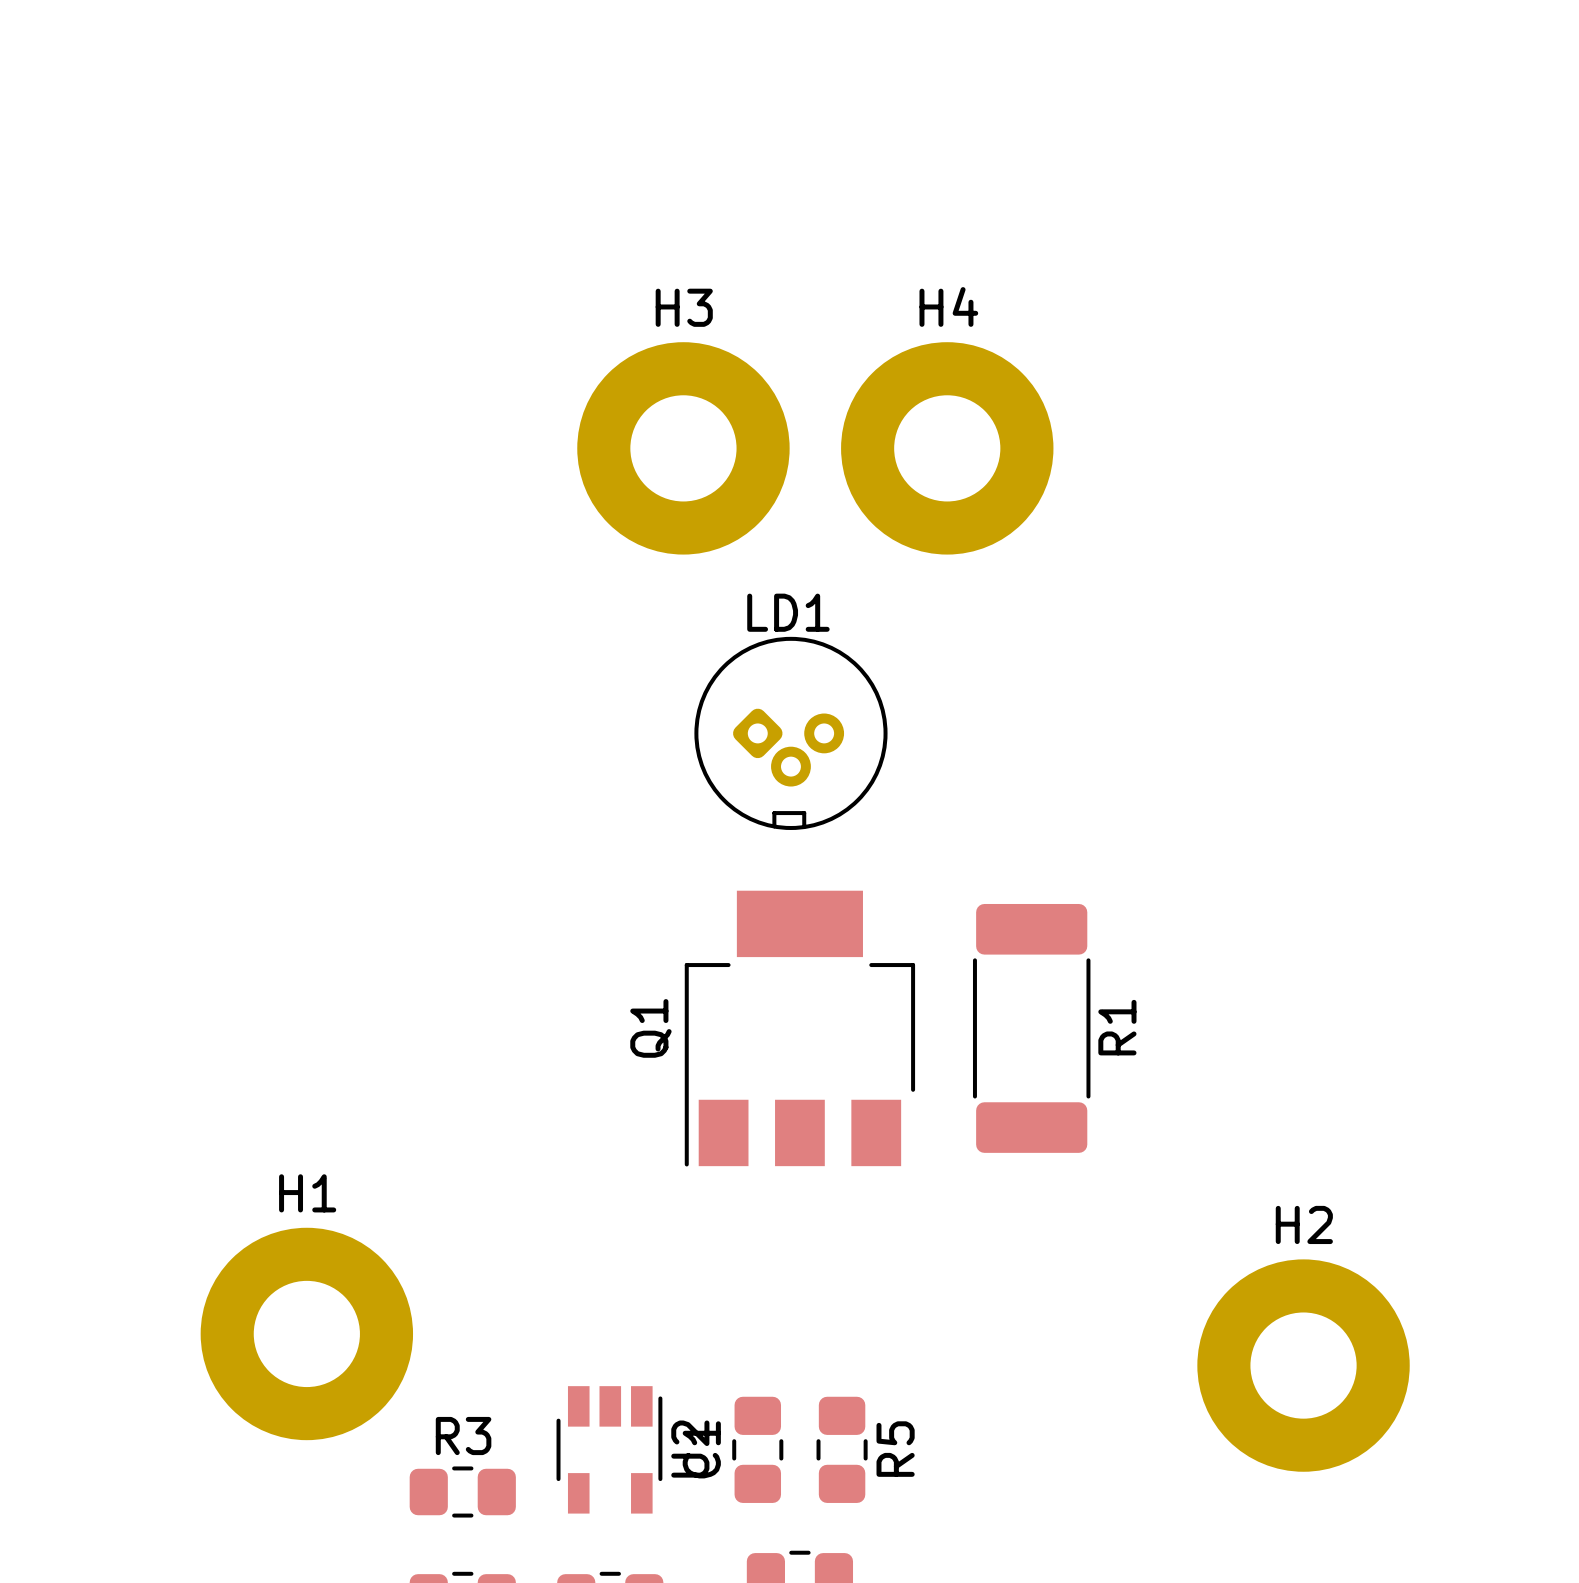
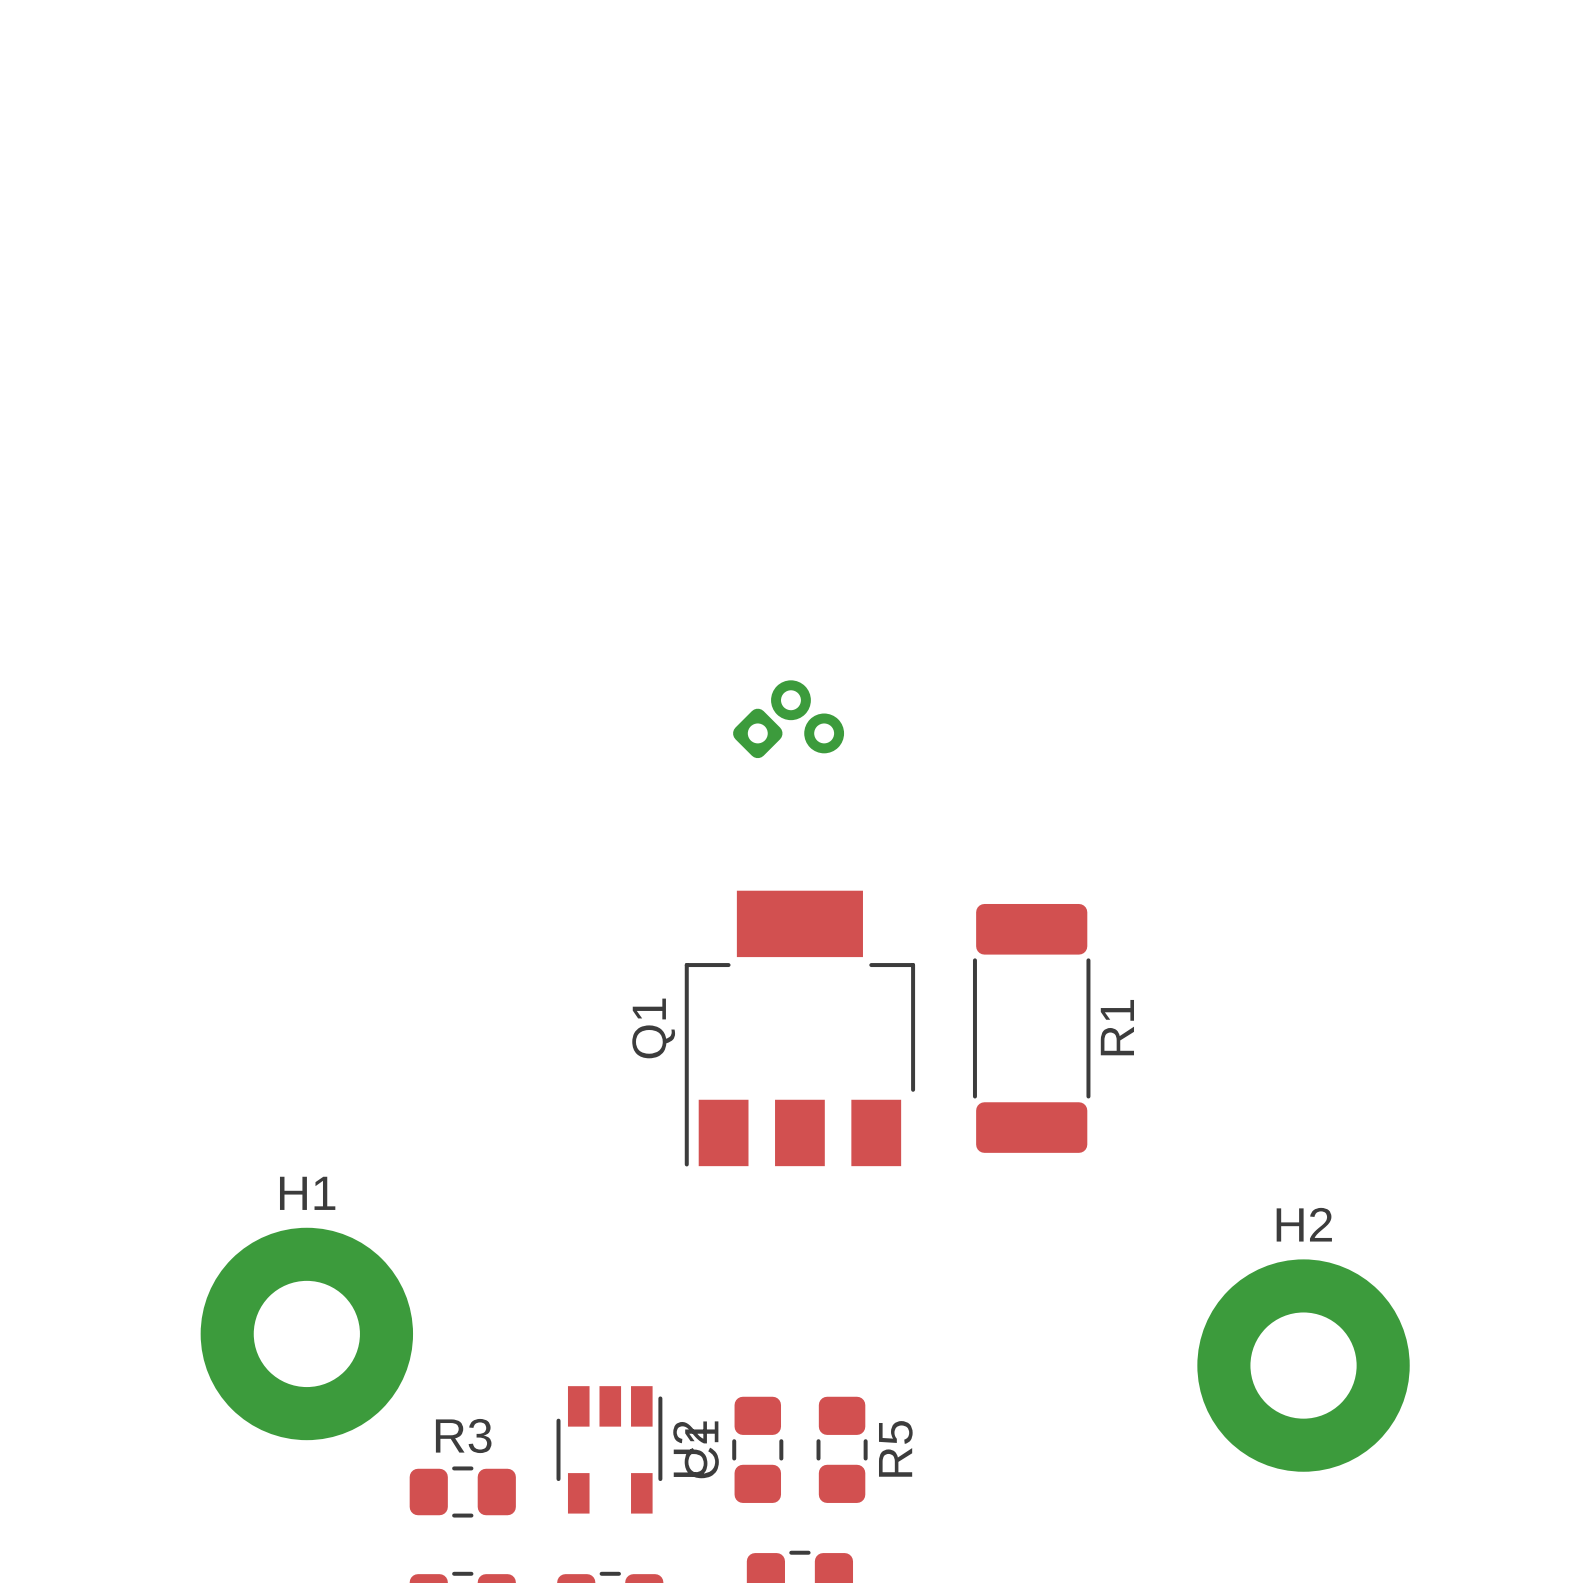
H3: (683, 448) -> none
H4: (947, 448) -> none
LD1 side: top (790, 733) -> bottom (788, 719)

